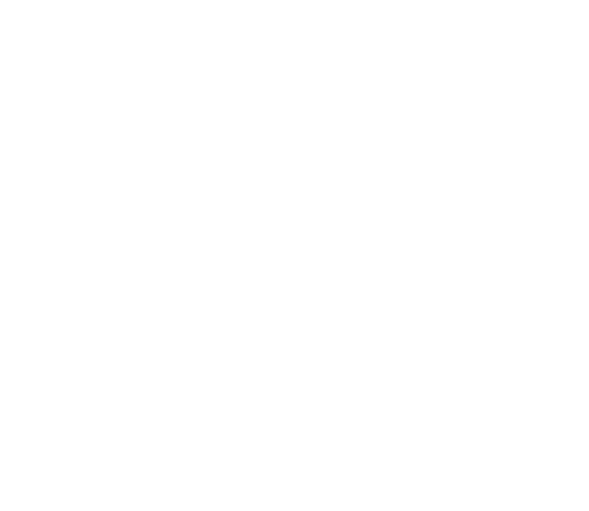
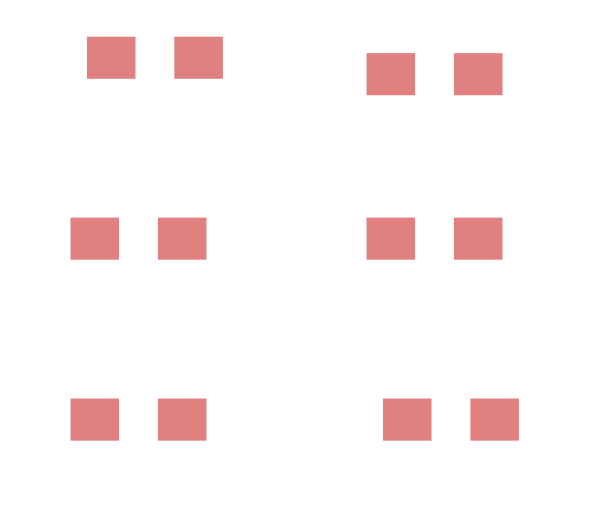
part: none -> (154, 57)
part: none -> (434, 74)
part: none -> (138, 238)
part: none -> (434, 238)
part: none -> (138, 419)
part: none -> (450, 419)

